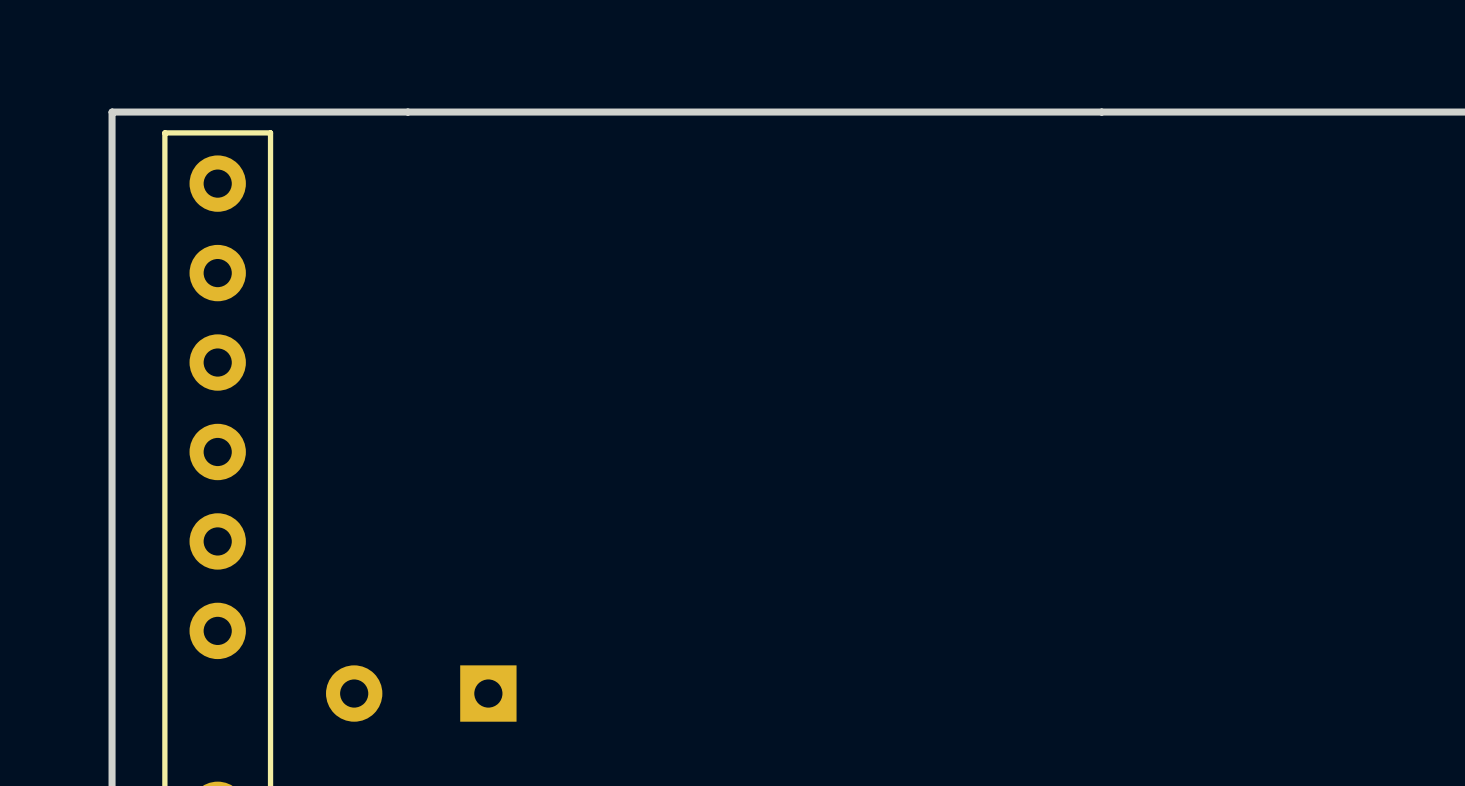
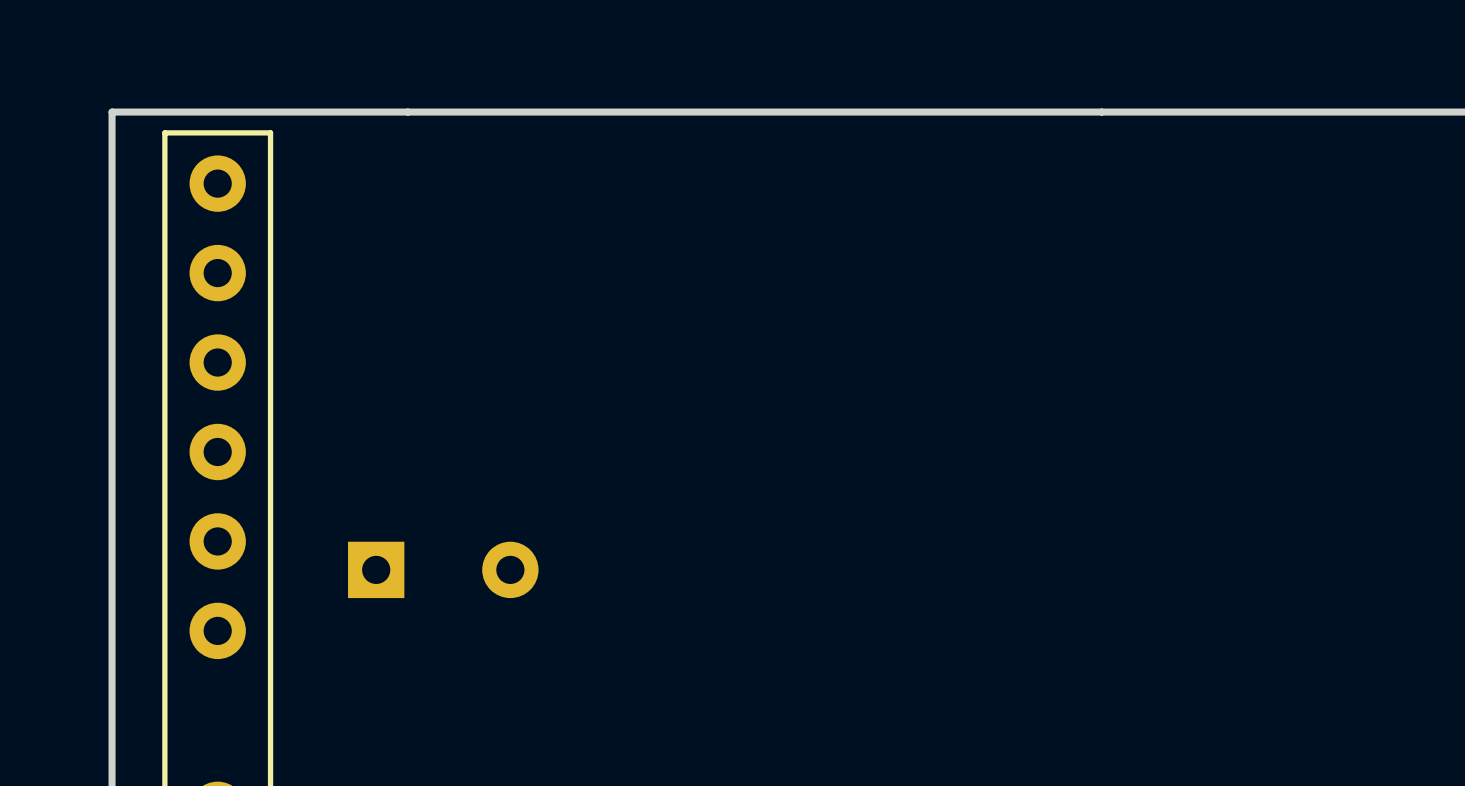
part rotation: 0° (421, 693) -> 180° (443, 569)
part position: (421, 693) -> (443, 569)

